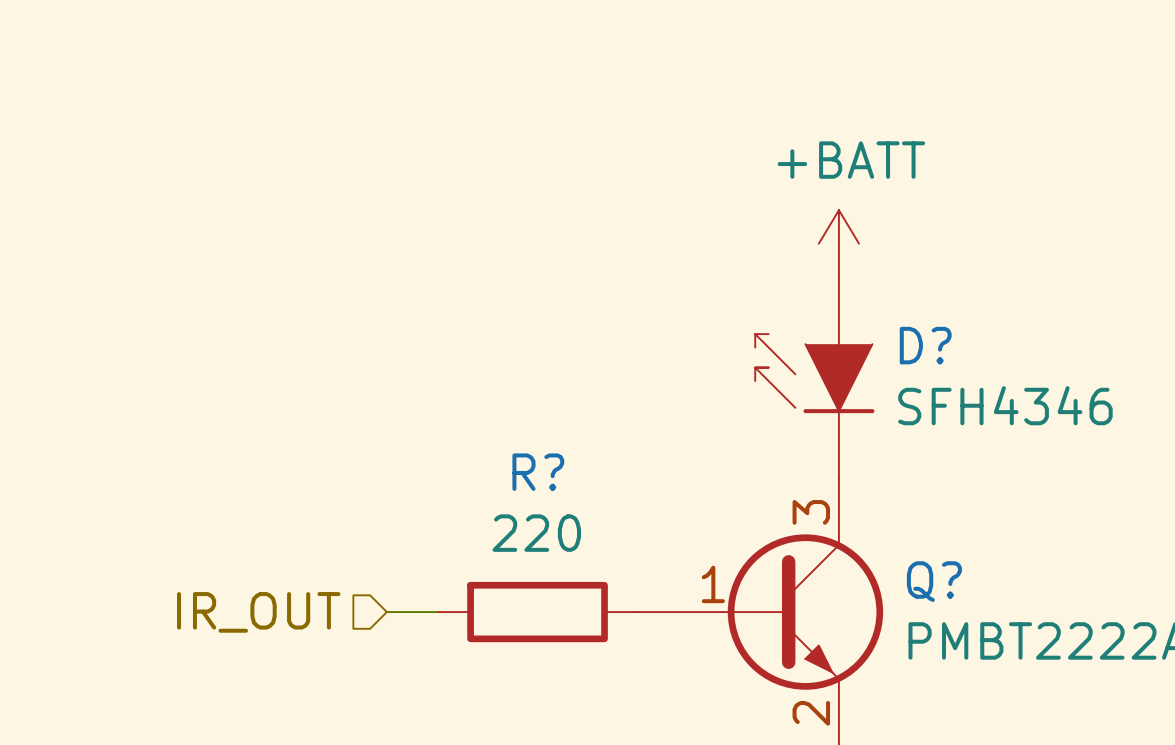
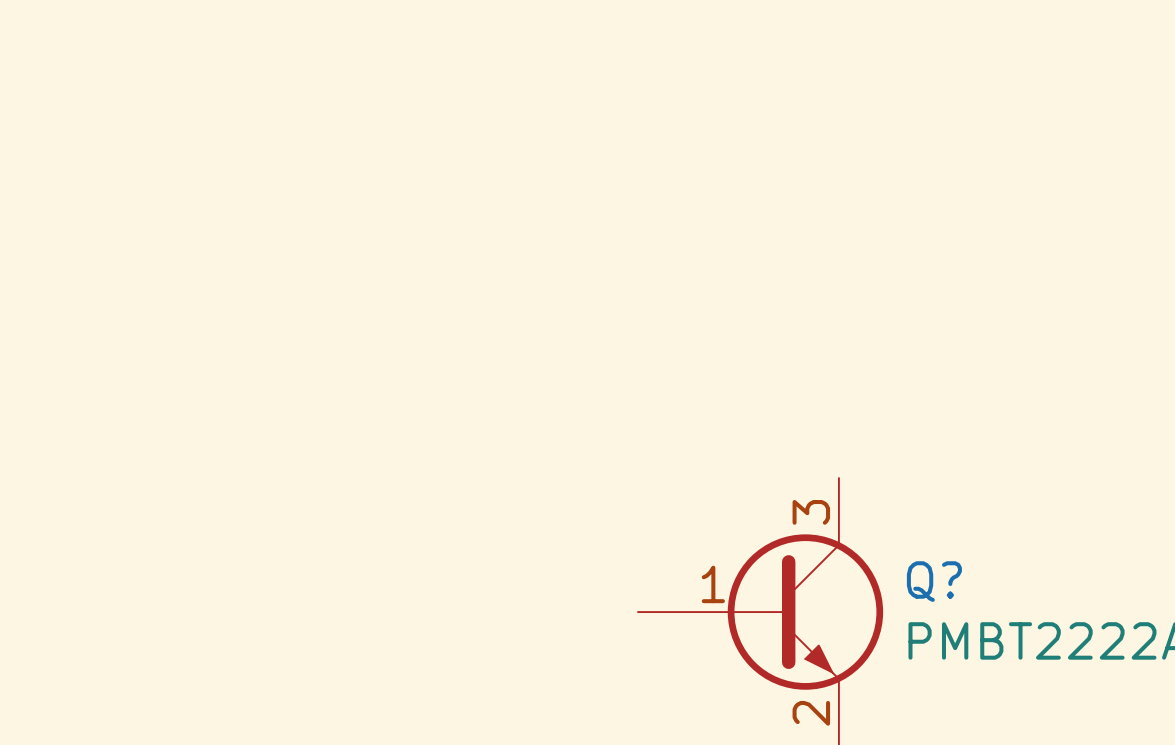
power symbol: +BATT (838, 243) -> none
D?: SFH4346 (814, 377) -> none
hierarchical label: IR_OUT (258, 612) -> none
wire: (386, 612) (437, 612) -> none
R?: 220 (537, 612) -> none

